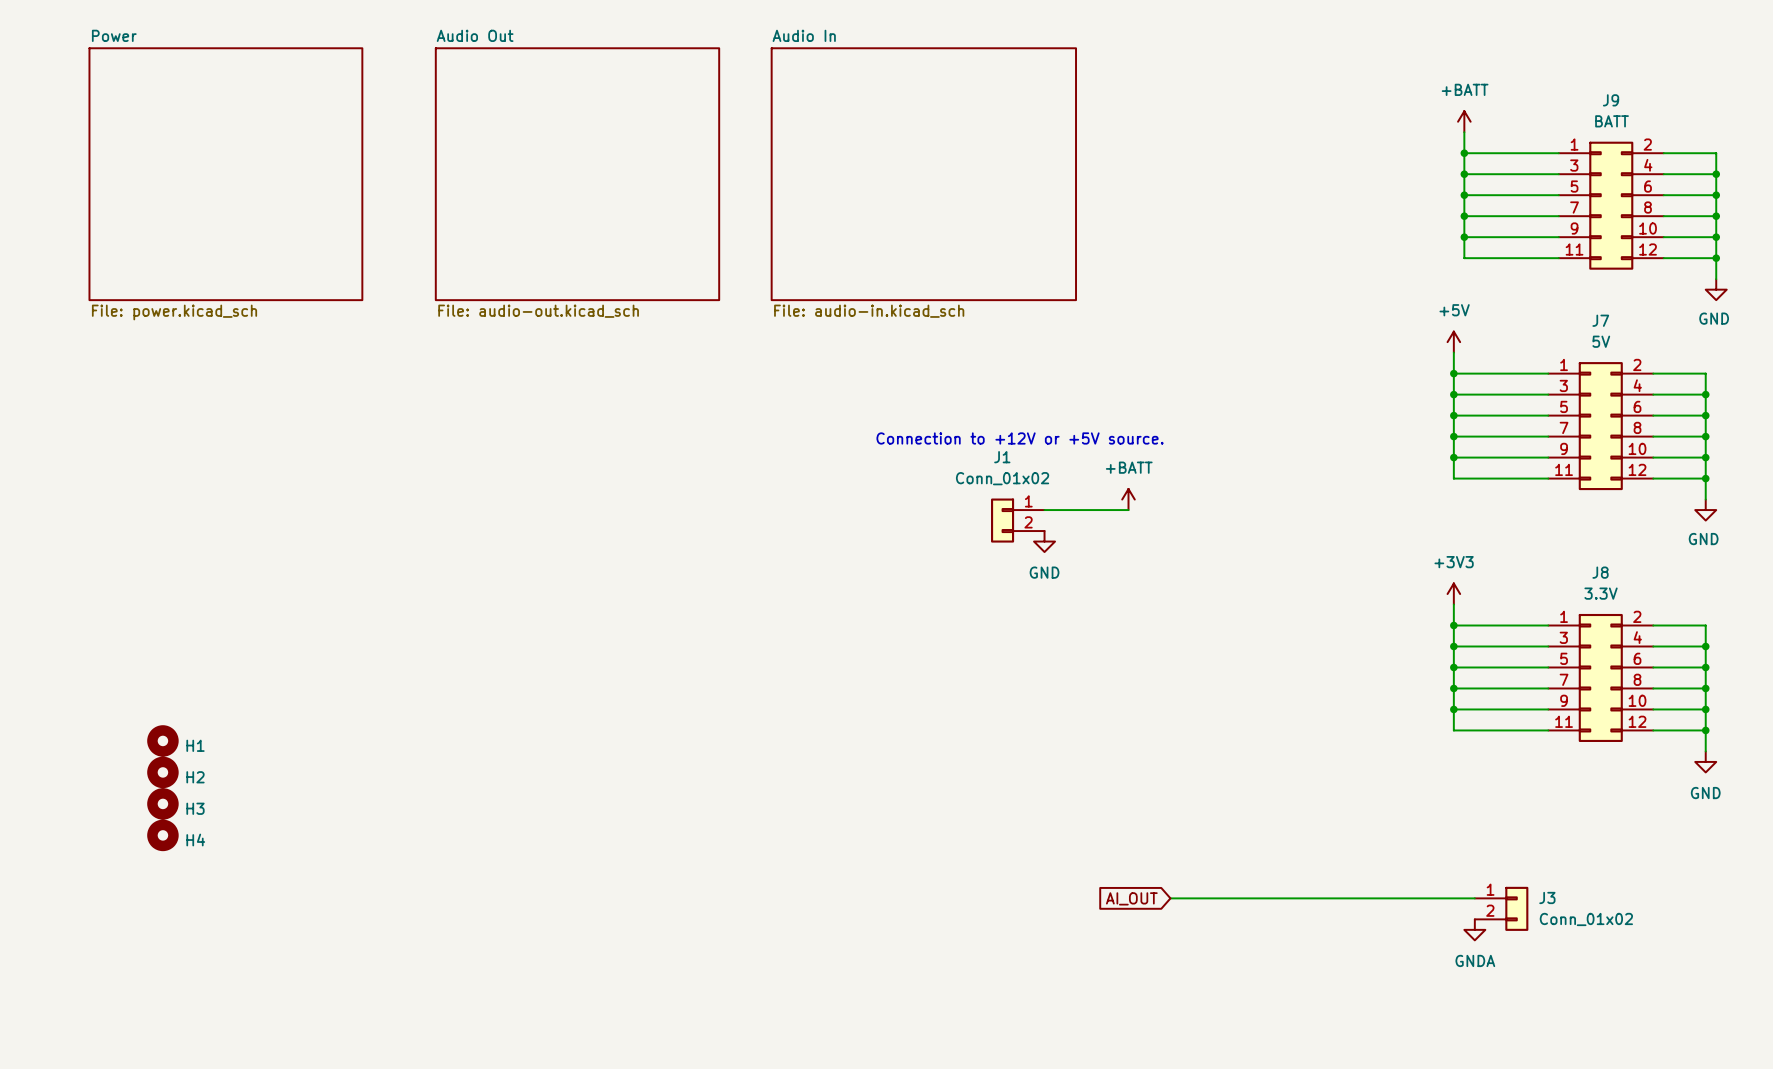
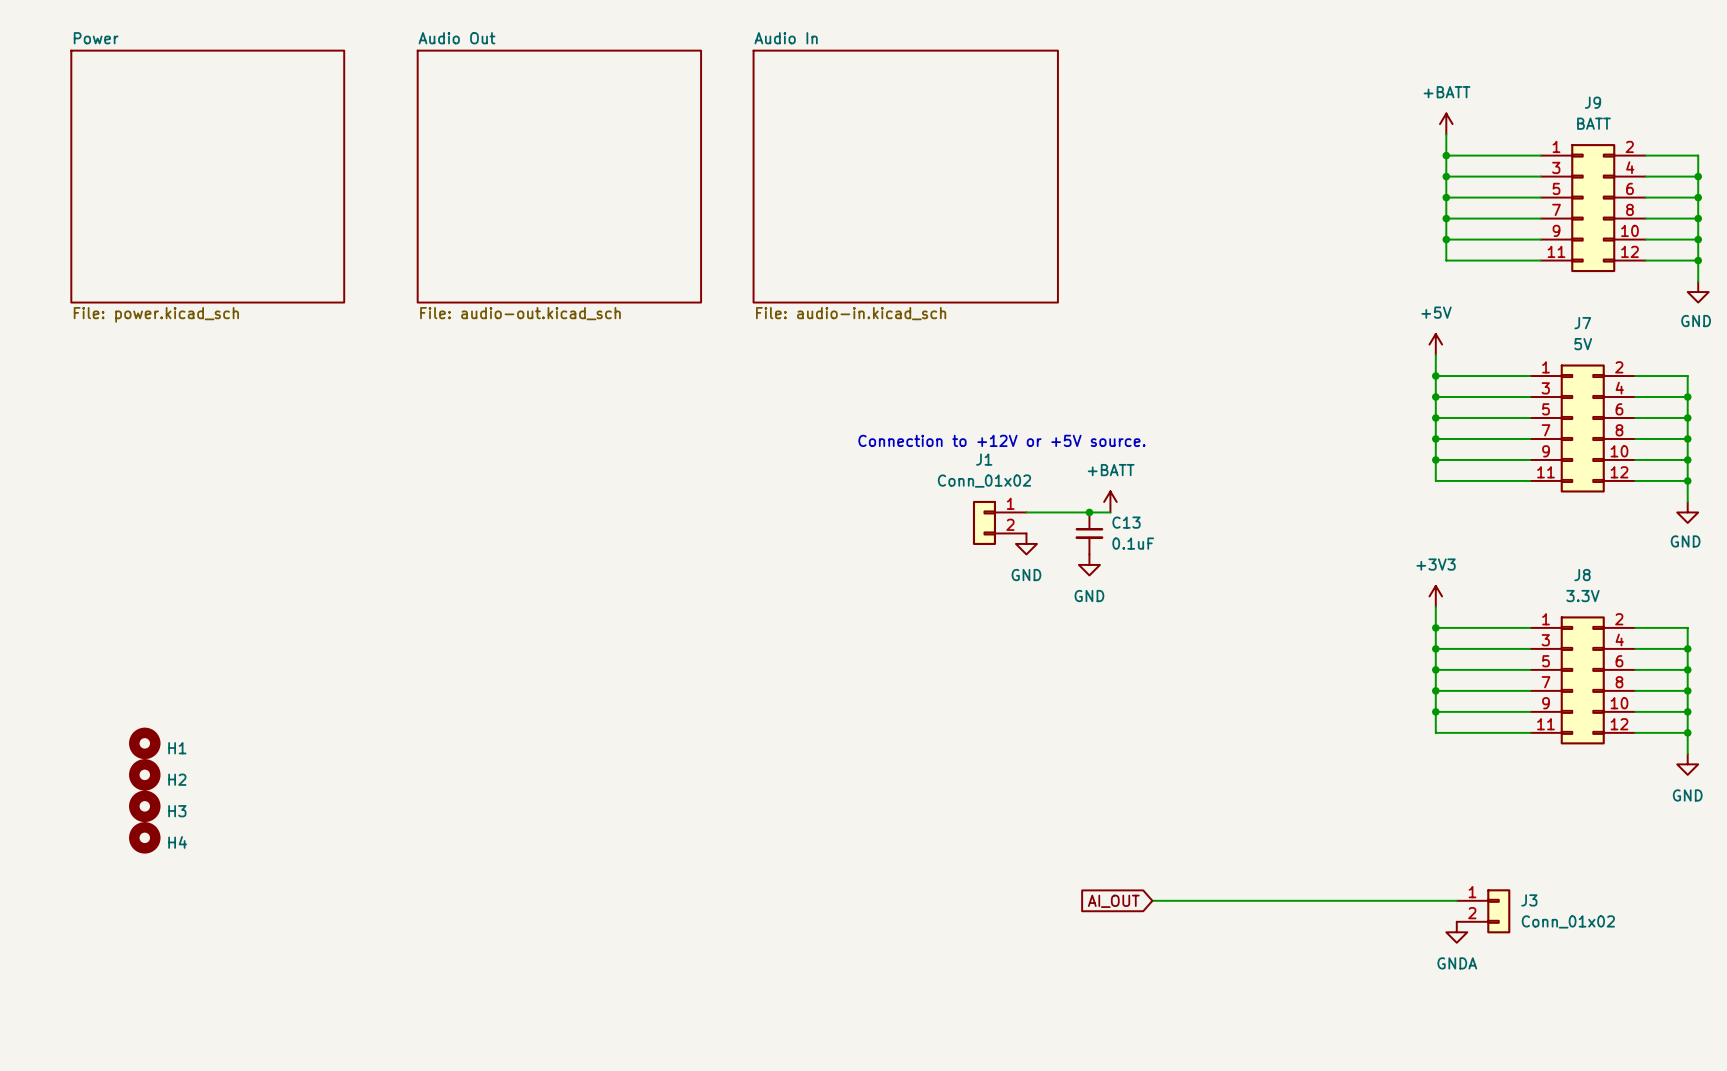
junction: none -> (1089, 512)
C13: none -> 0.1uF (1089, 533)
power symbol: none -> GND (1089, 564)

